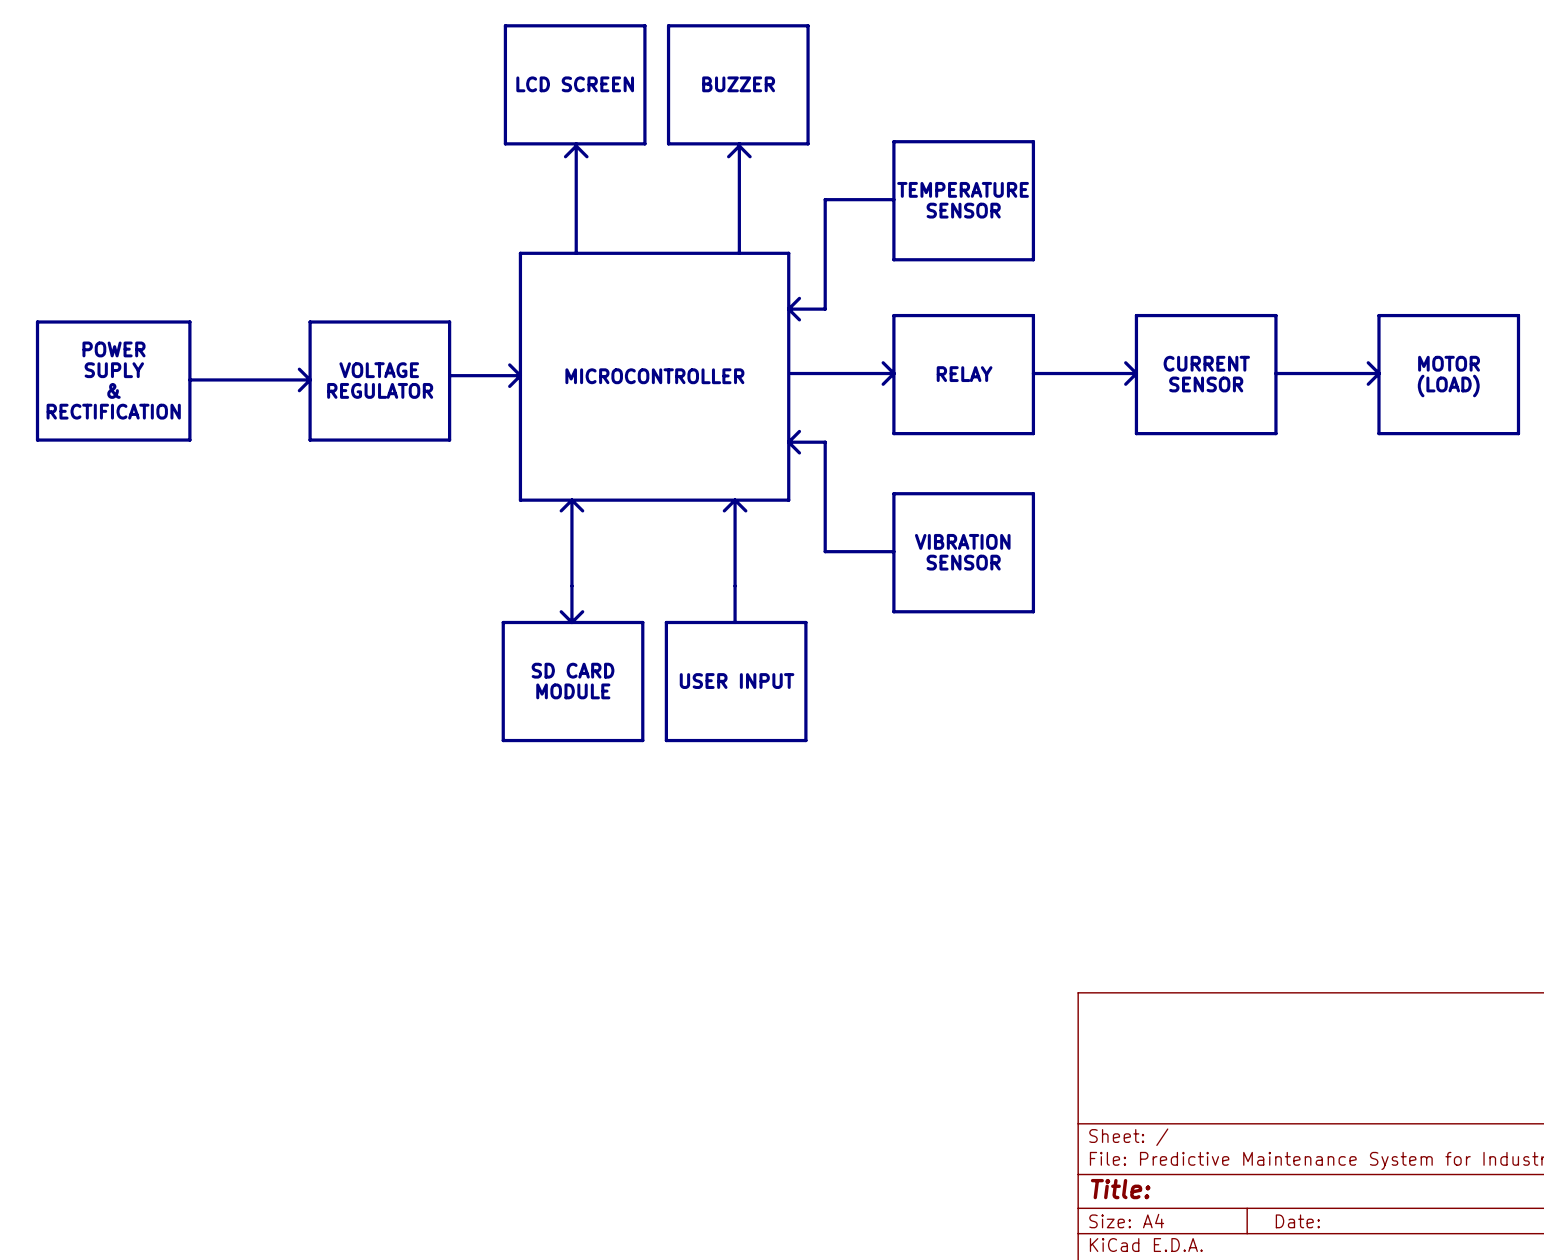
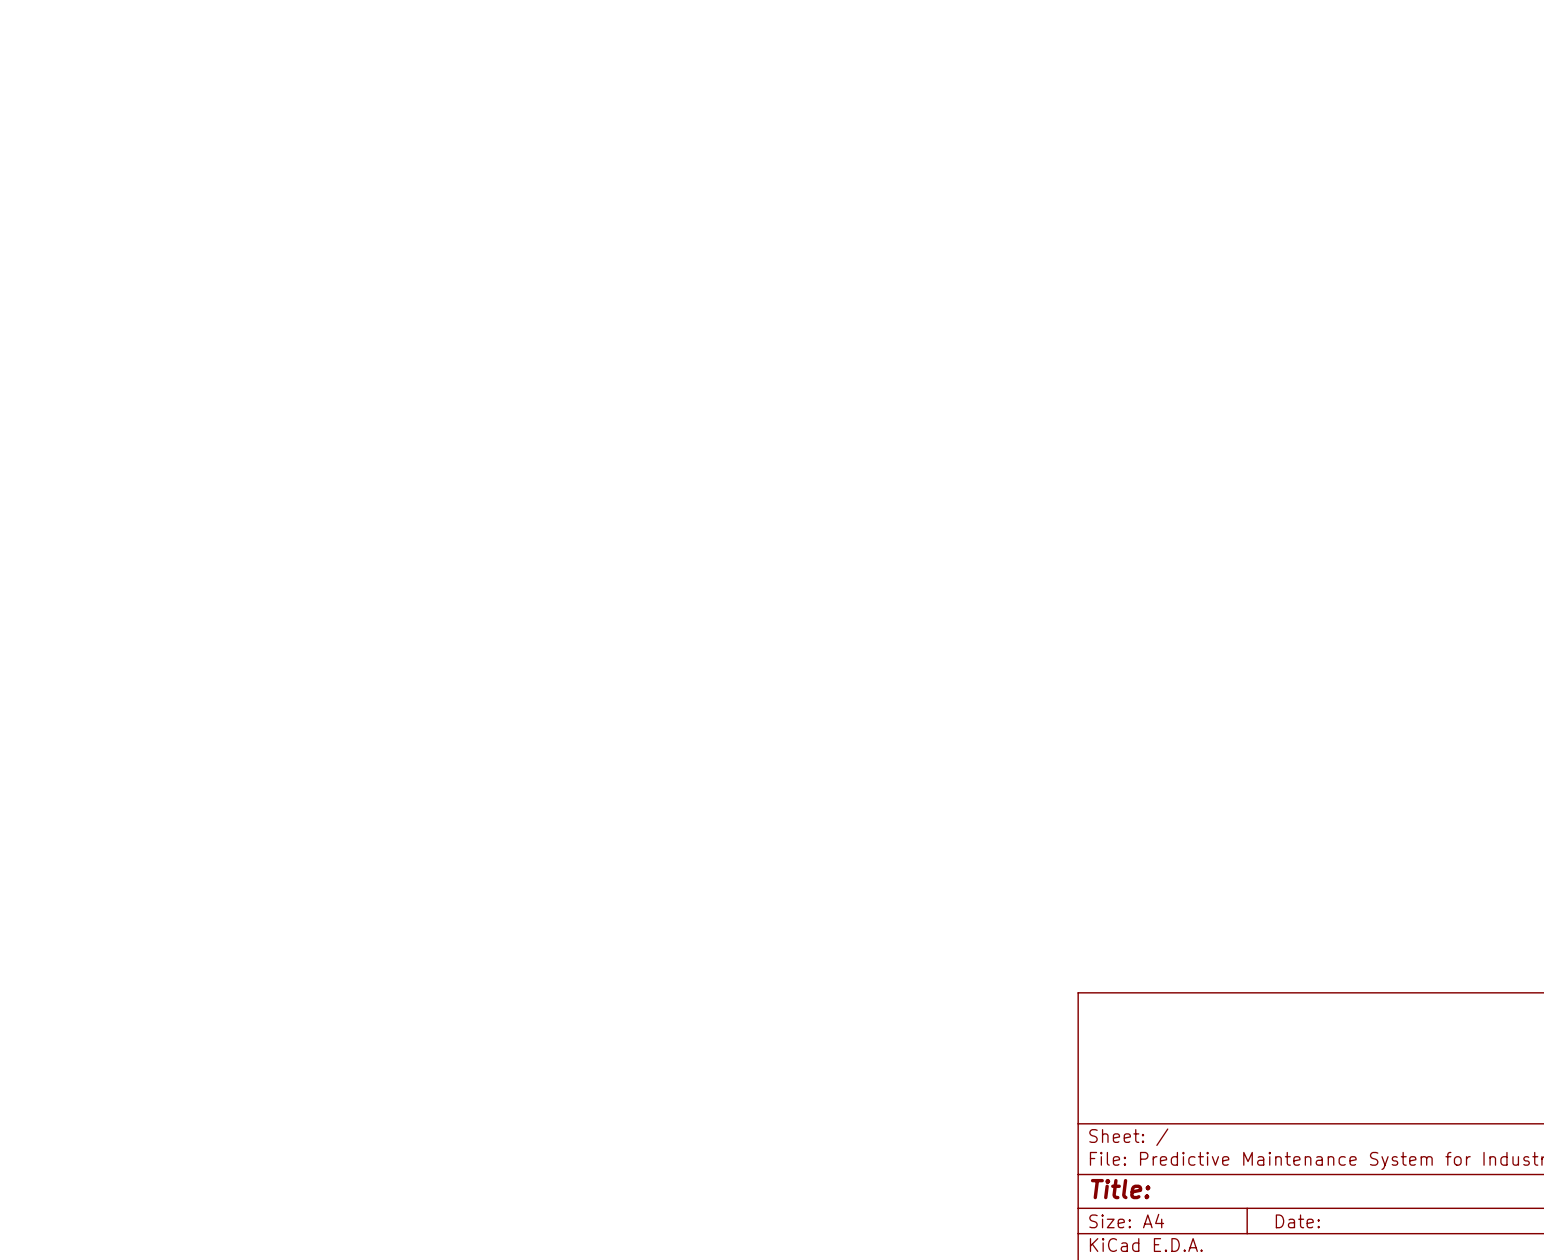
line: (505, 25) (644, 25) (644, 143) (505, 143) (505, 25) -> none
line: (668, 25) (808, 25) (808, 143) (668, 143) (668, 25) -> none
text: LCD SCREEN (575, 84) -> none
text: BUZZER (738, 84) -> none
line: (893, 141) (1033, 141) (1033, 259) (893, 259) (893, 141) -> none
line: (576, 143) (576, 253) -> none
line: (739, 143) (739, 253) -> none
line: (565, 156) (576, 146) (586, 156) -> none
line: (728, 156) (739, 146) (750, 156) -> none
text: TEMPERATURE (963, 189) -> none
line: (893, 199) (825, 199) (825, 309) (788, 309) -> none
text: SENSOR (963, 210) -> none
line: (520, 253) (788, 253) (788, 500) (520, 500) (520, 253) -> none
line: (799, 298) (788, 309) -> none
line: (788, 309) (799, 319) -> none
line: (893, 315) (893, 433) (1033, 433) (1033, 315) (893, 315) -> none
line: (1136, 315) (1275, 315) (1275, 433) (1136, 433) (1136, 315) -> none
line: (1378, 315) (1518, 315) (1518, 433) (1378, 433) (1378, 315) -> none
line: (37, 322) (189, 322) (189, 440) (37, 440) (37, 322) -> none
line: (310, 322) (449, 322) (449, 440) (310, 440) (310, 322) -> none
text: POWER (114, 349) -> none
line: (883, 362) (893, 373) -> none
line: (1125, 362) (1136, 373) -> none
line: (1368, 362) (1378, 373) -> none
text: CURRENT (1206, 363) -> none
text: MOTOR (1449, 363) -> none
line: (509, 364) (520, 375) (509, 386) -> none
line: (299, 369) (310, 379) -> none
text: SUPLY (114, 370) -> none
text: VOLTAGE (379, 370) -> none
line: (790, 373) (893, 373) -> none
line: (893, 373) (883, 384) -> none
line: (1033, 373) (1136, 373) -> none
line: (1136, 373) (1125, 384) -> none
line: (1275, 373) (1378, 373) -> none
line: (1378, 373) (1368, 384) -> none
text: RELAY (964, 374) -> none
line: (449, 375) (518, 375) -> none
text: MICROCONTROLLER (654, 376) -> none
line: (189, 379) (310, 379) -> none
line: (310, 379) (299, 390) -> none
text: SENSOR (1206, 384) -> none
text: (LOAD) (1448, 386) -> none
text: & (114, 390) -> none
text: REGULATOR (380, 390) -> none
text: RECTIFICATION (113, 411) -> none
line: (799, 431) (788, 442) -> none
line: (788, 442) (799, 452) -> none
line: (788, 442) (825, 442) (825, 551) (893, 551) -> none
line: (893, 493) (893, 611) (1033, 611) (1033, 493) (893, 493) -> none
line: (571, 500) (561, 510) -> none
line: (571, 500) (582, 510) -> none
line: (571, 500) (571, 622) -> none
line: (735, 500) (745, 510) -> none
line: (735, 500) (735, 622) -> none
line: (735, 500) (724, 510) -> none
text: VIBRATION (962, 541) -> none
text: SENSOR (963, 562) -> none
line: (561, 611) (571, 622) -> none
line: (582, 611) (571, 622) -> none
line: (503, 622) (642, 622) (642, 740) (503, 740) (503, 622) -> none
line: (666, 622) (805, 622) (805, 740) (666, 740) (666, 622) -> none
text: SD CARD (573, 670) -> none
text: USER INPUT (737, 681) -> none
text: MODULE (573, 691) -> none

